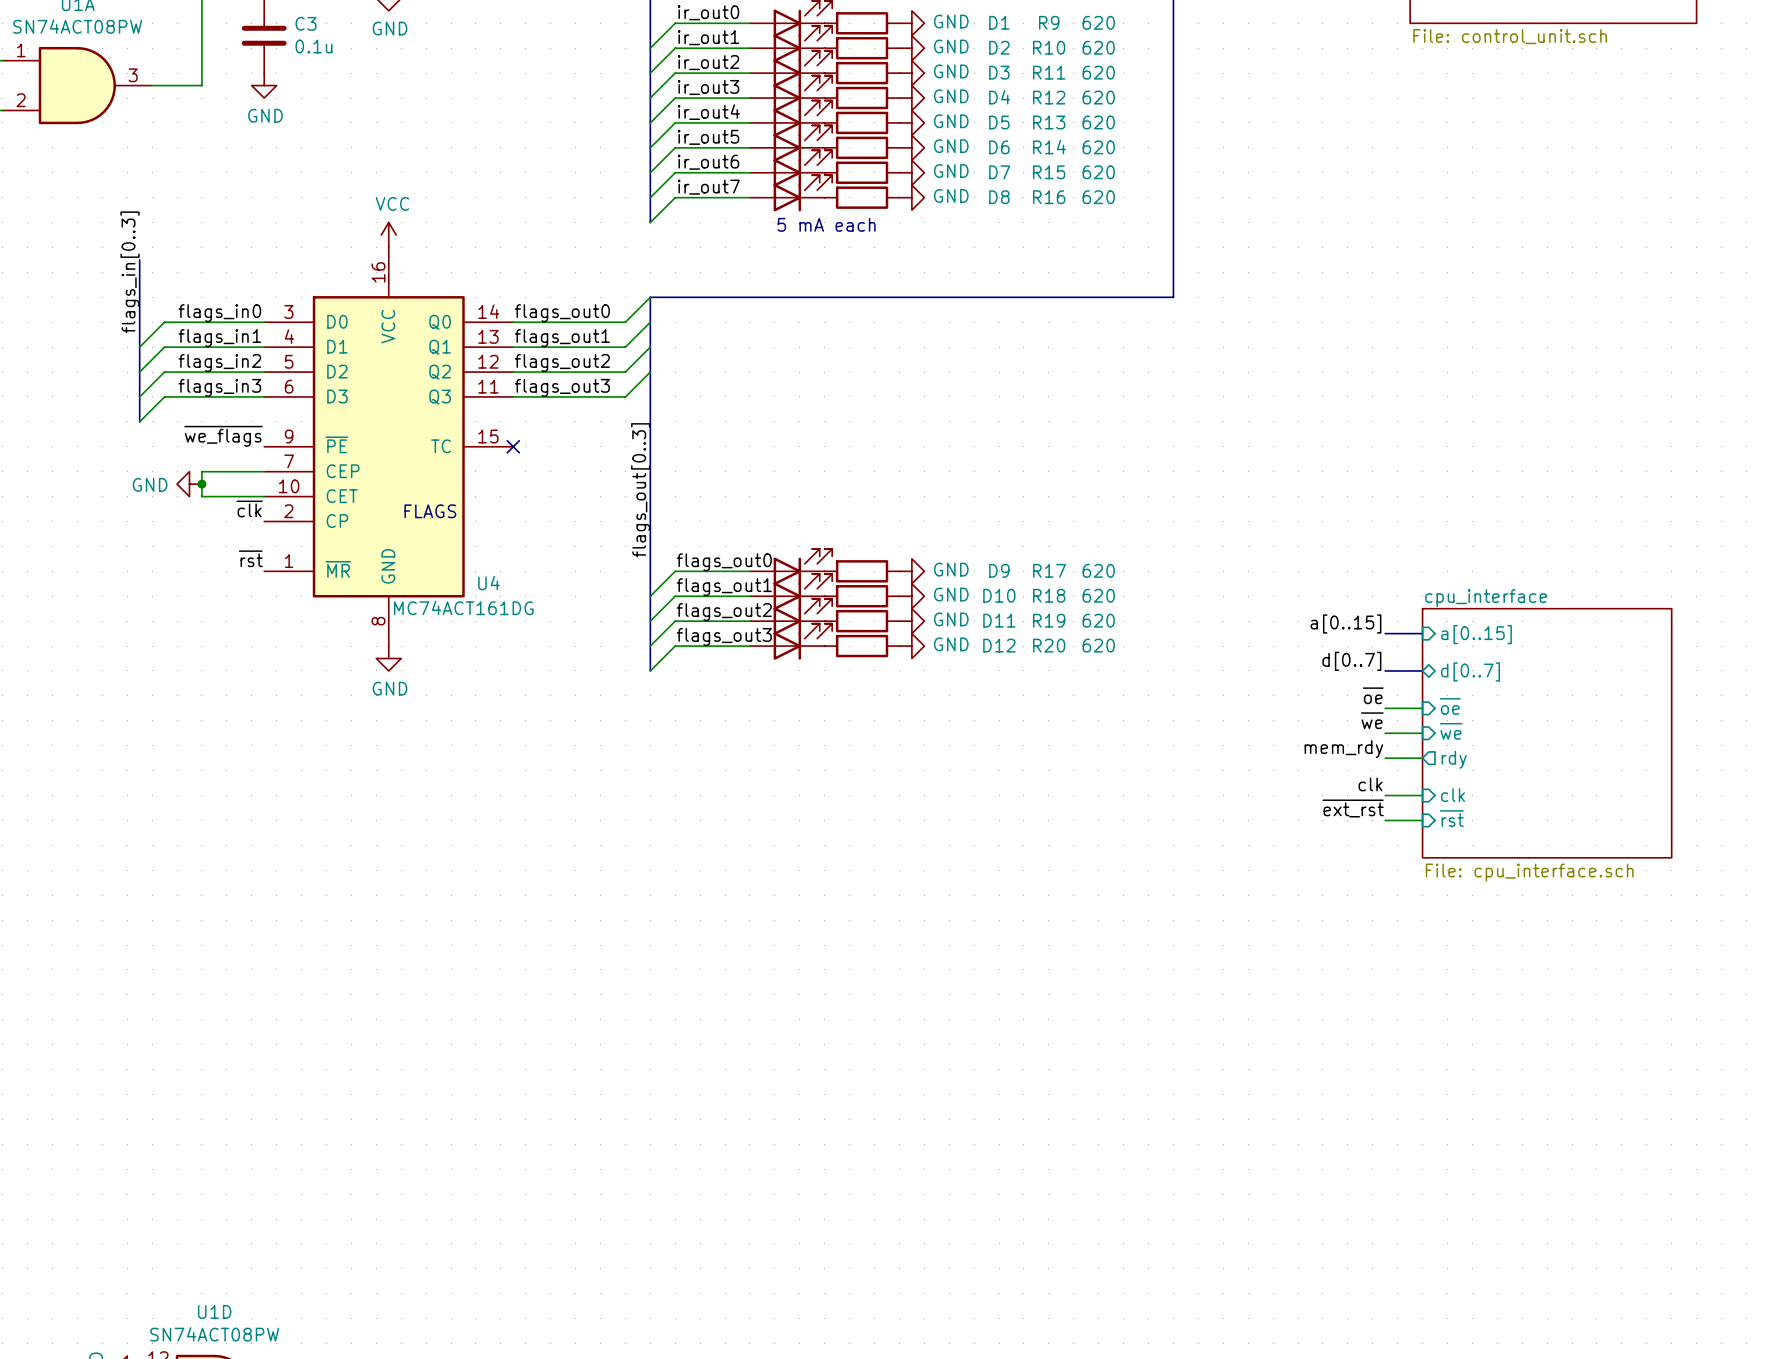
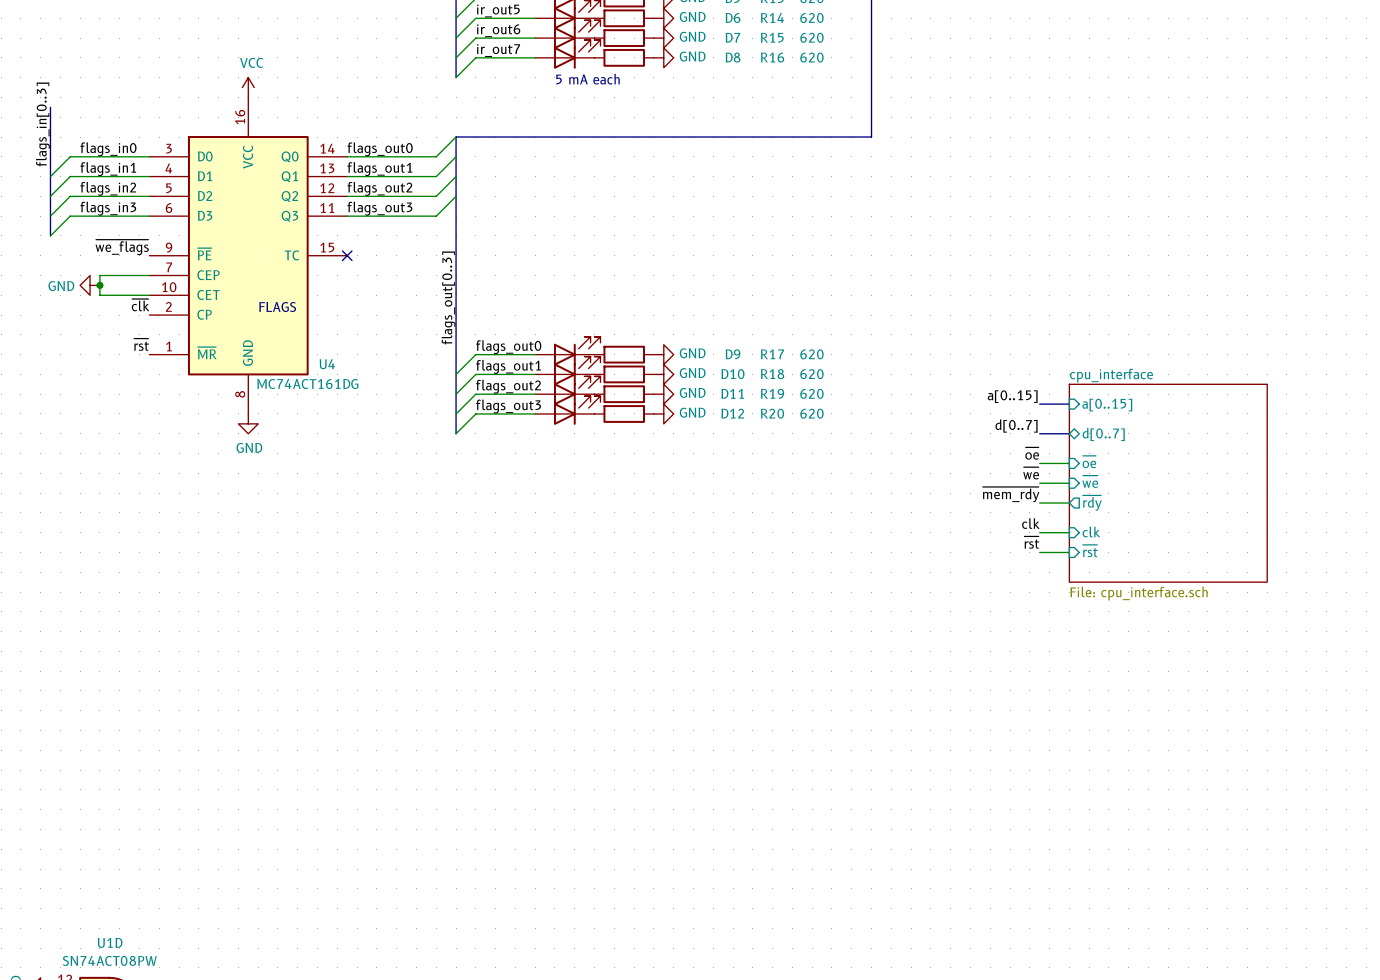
label: mem_rdy (1343, 749) -> ~{mem_rdy} (1011, 494)
sheet pin: rdy (1454, 759) -> ~{rdy} (1092, 503)
label: ~{ext_rst} (1353, 808) -> ~{rst} (1031, 542)

